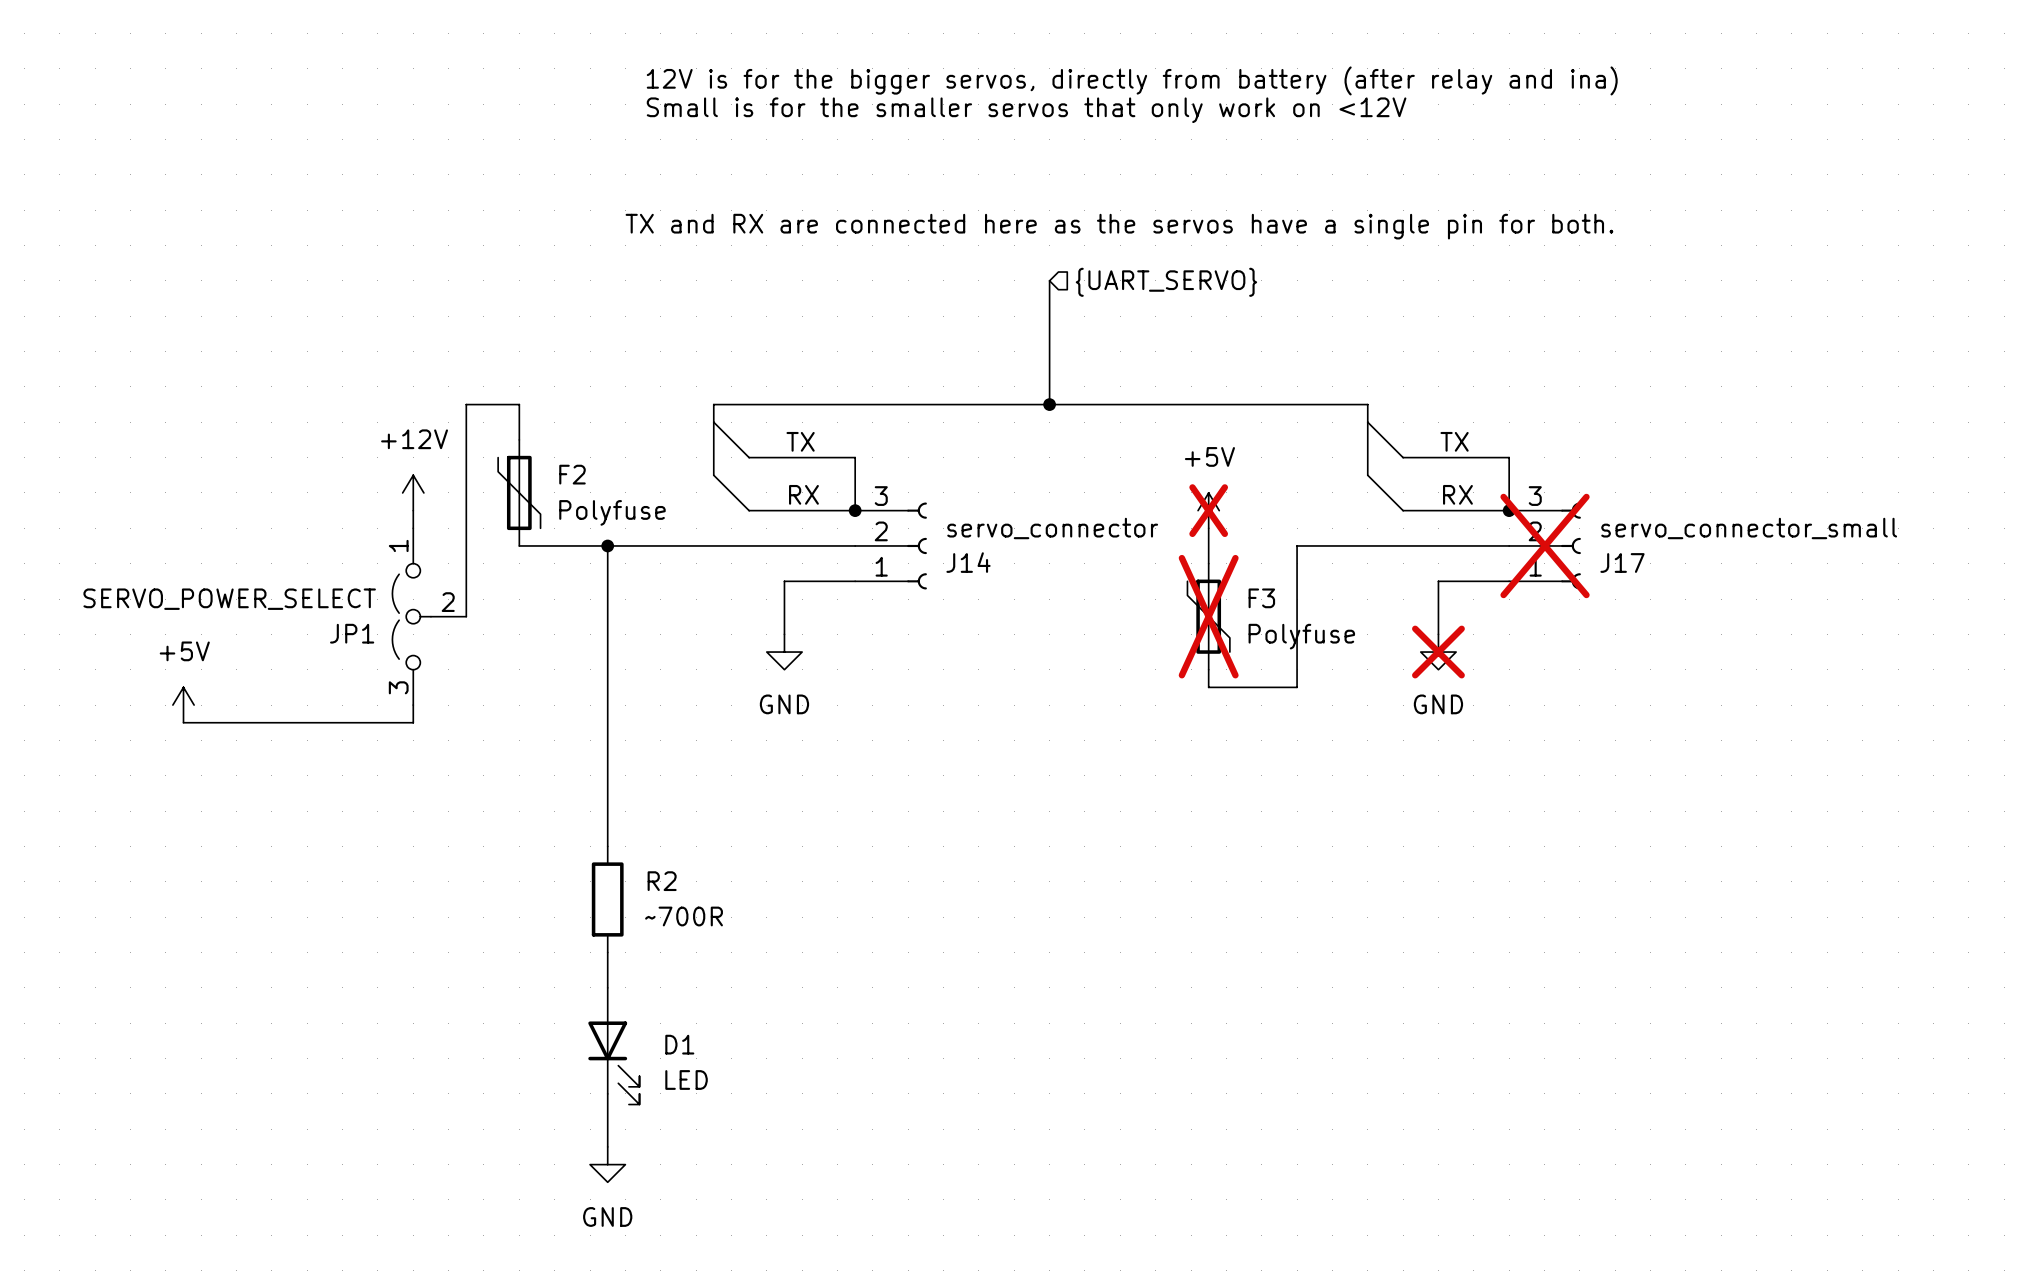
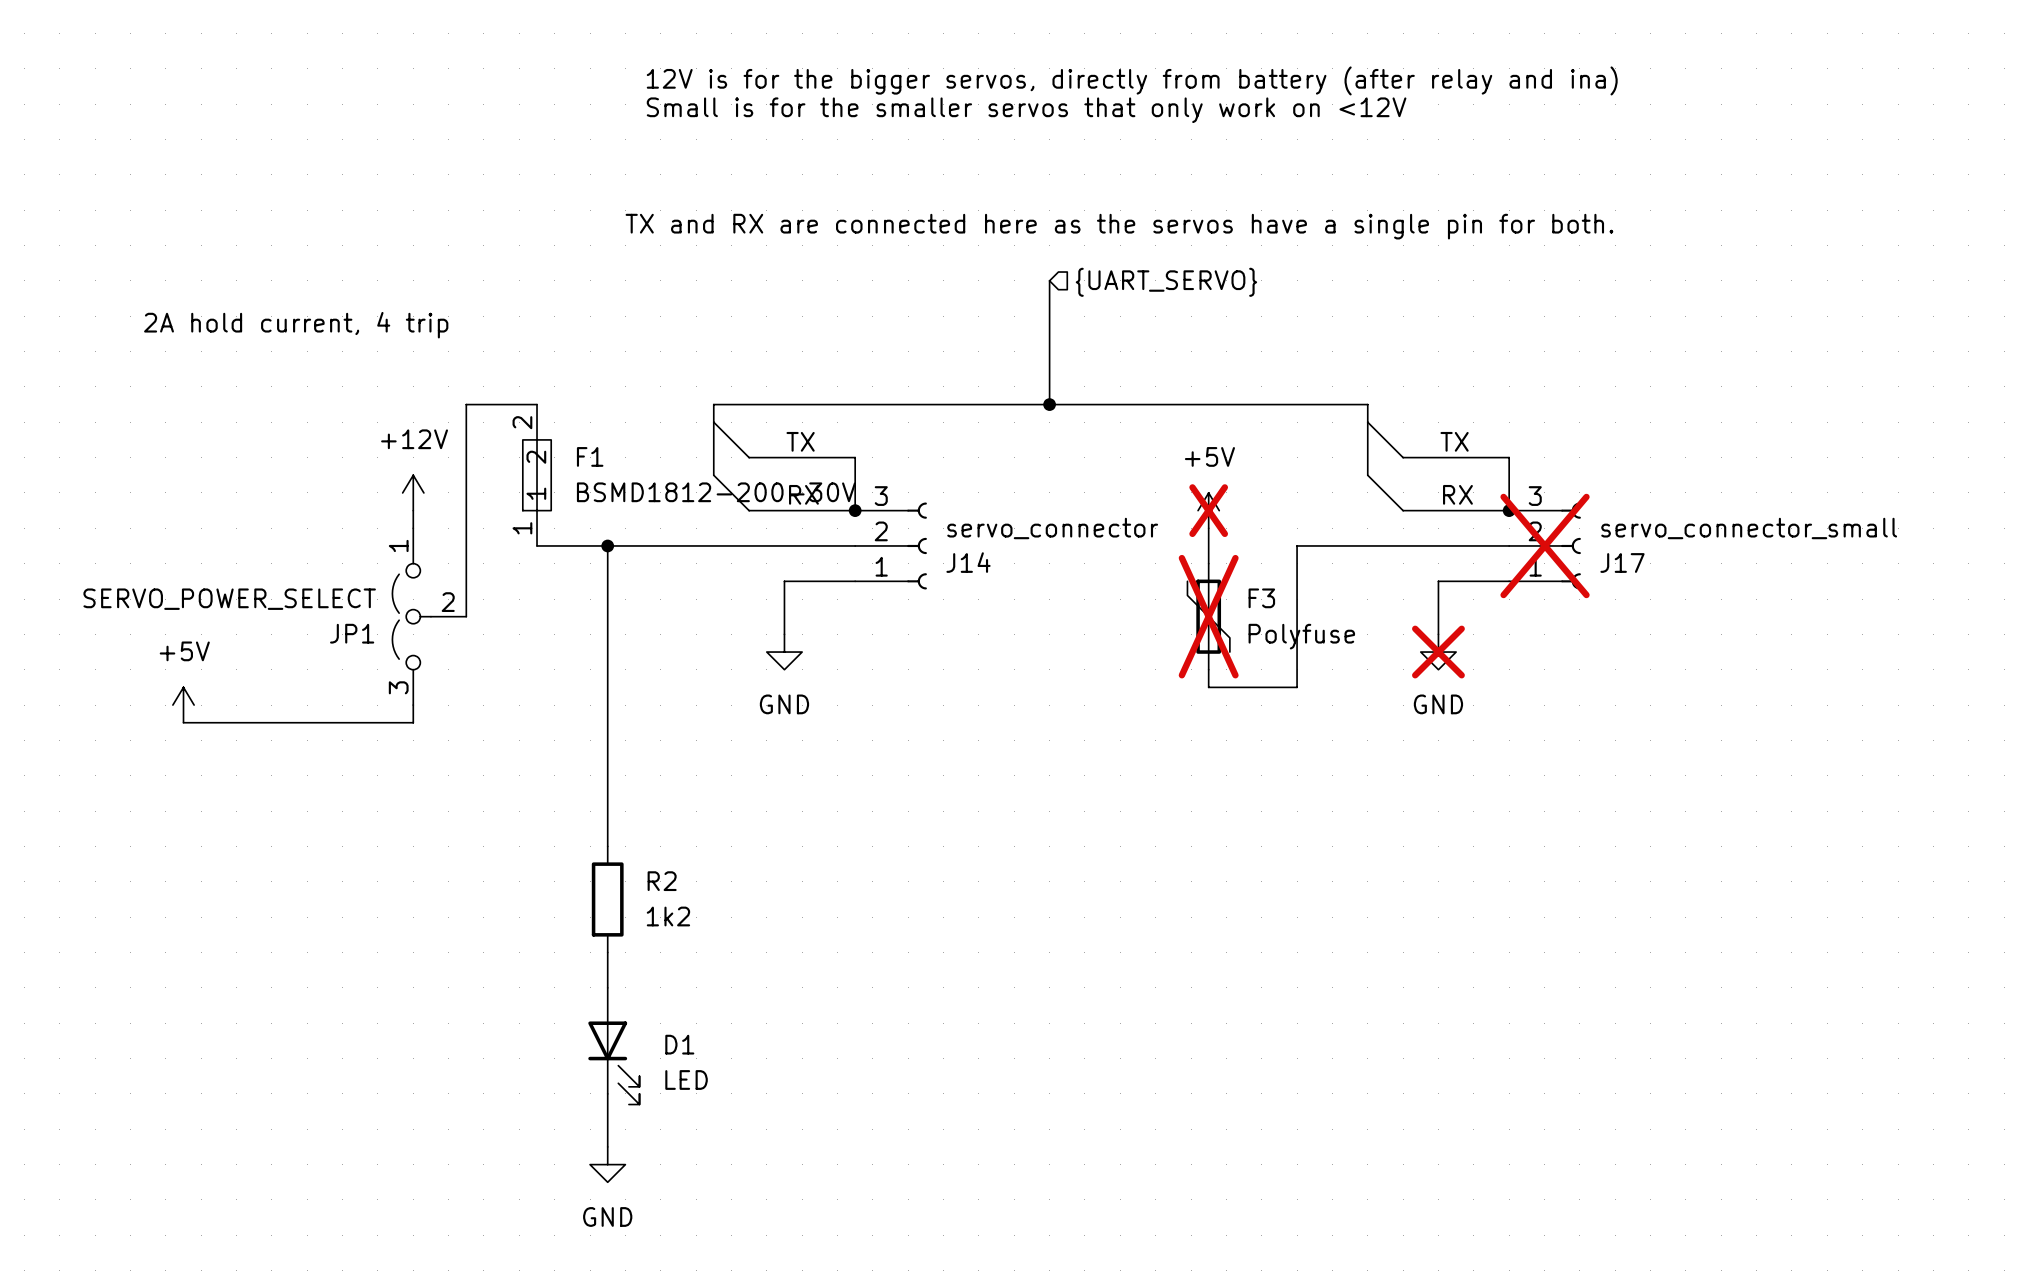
text: none -> 2A hold current, 4 trip (296, 325)
wire: (519, 404) (519, 439) -> (519, 404) (537, 404)
F1: none -> BSMD1812-200-30V (537, 475)
F2: Polyfuse (519, 492) -> none
wire: (519, 545) (537, 545) -> none
R2 value: ~700R (684, 916) -> 1k2 (668, 916)

